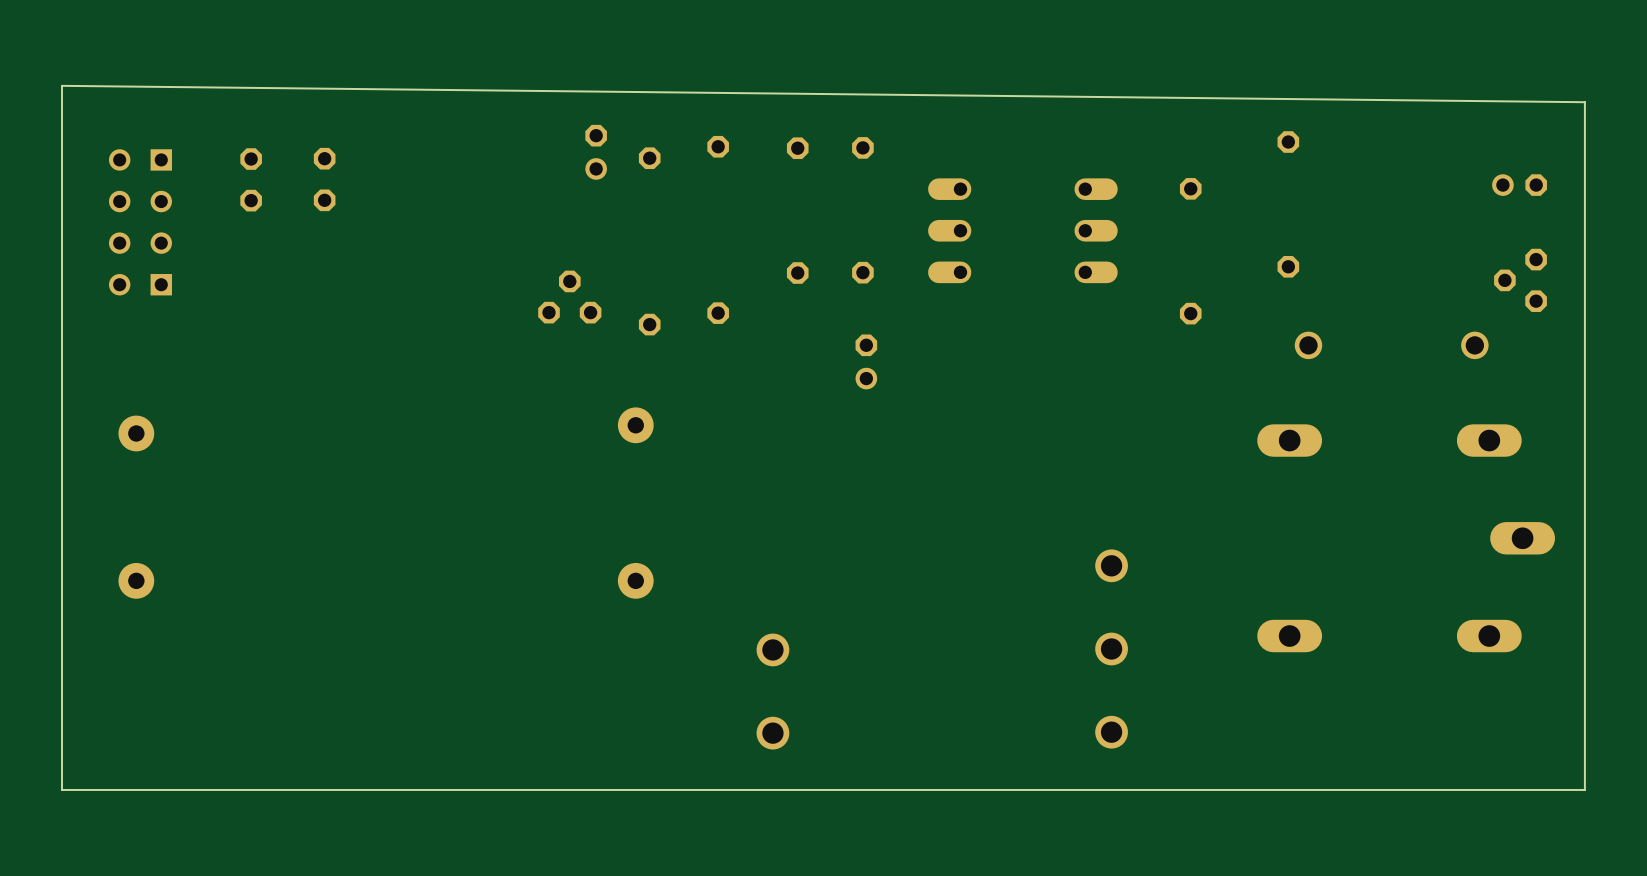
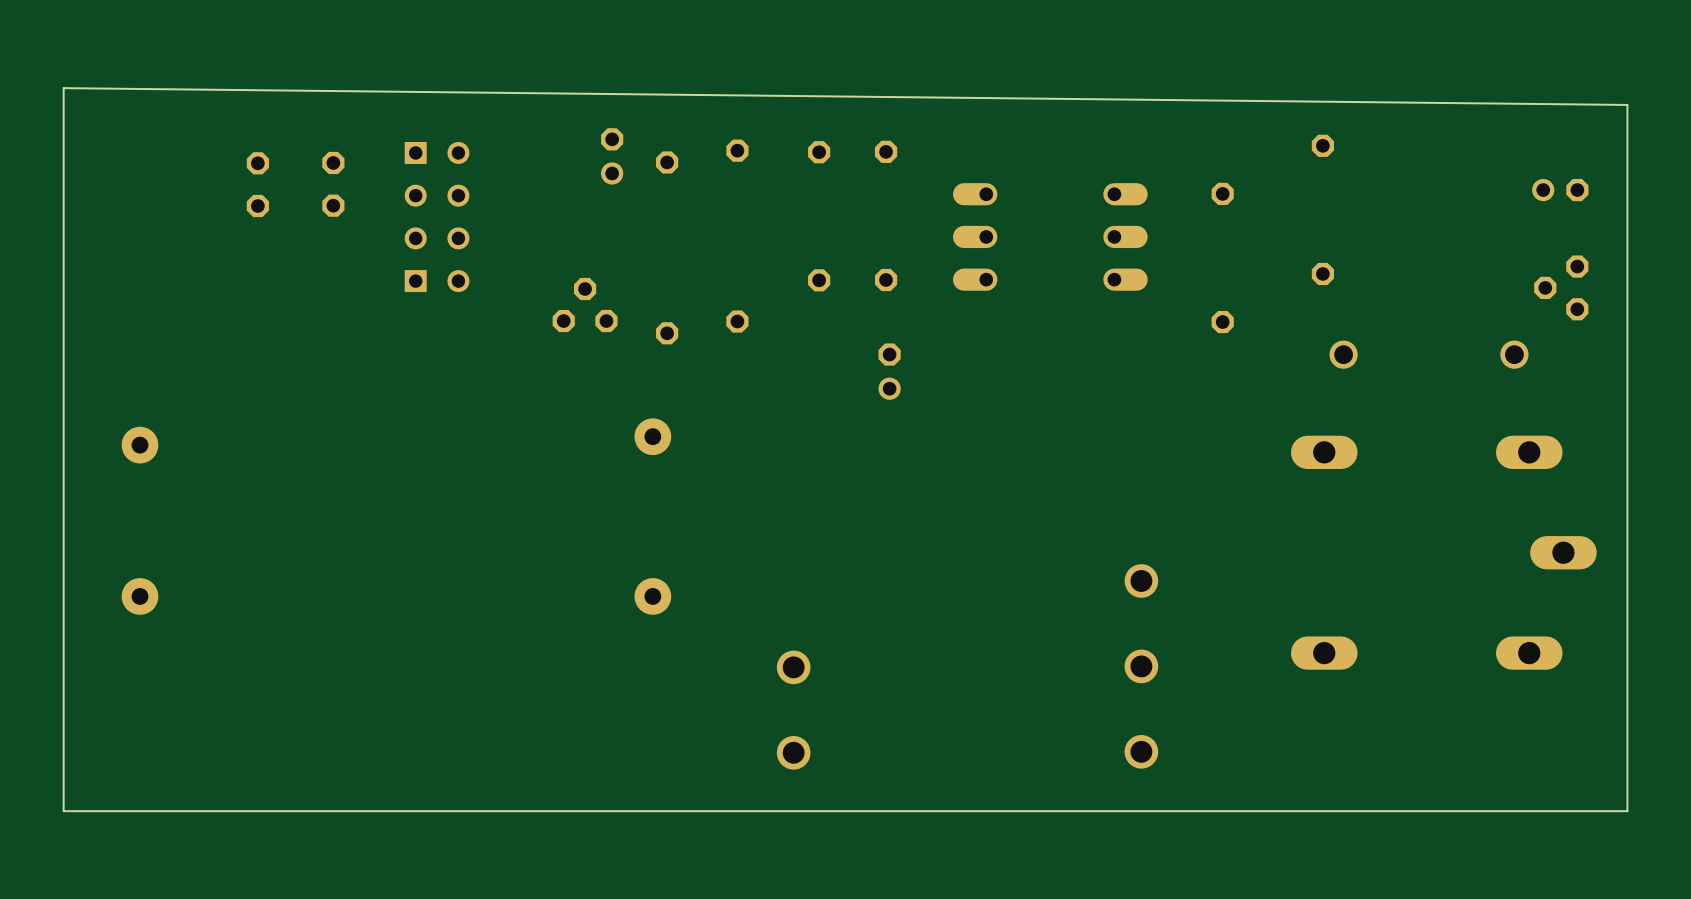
part rotation: 0° (140, 222) -> 180° (437, 217)
part position: (140, 222) -> (437, 217)

